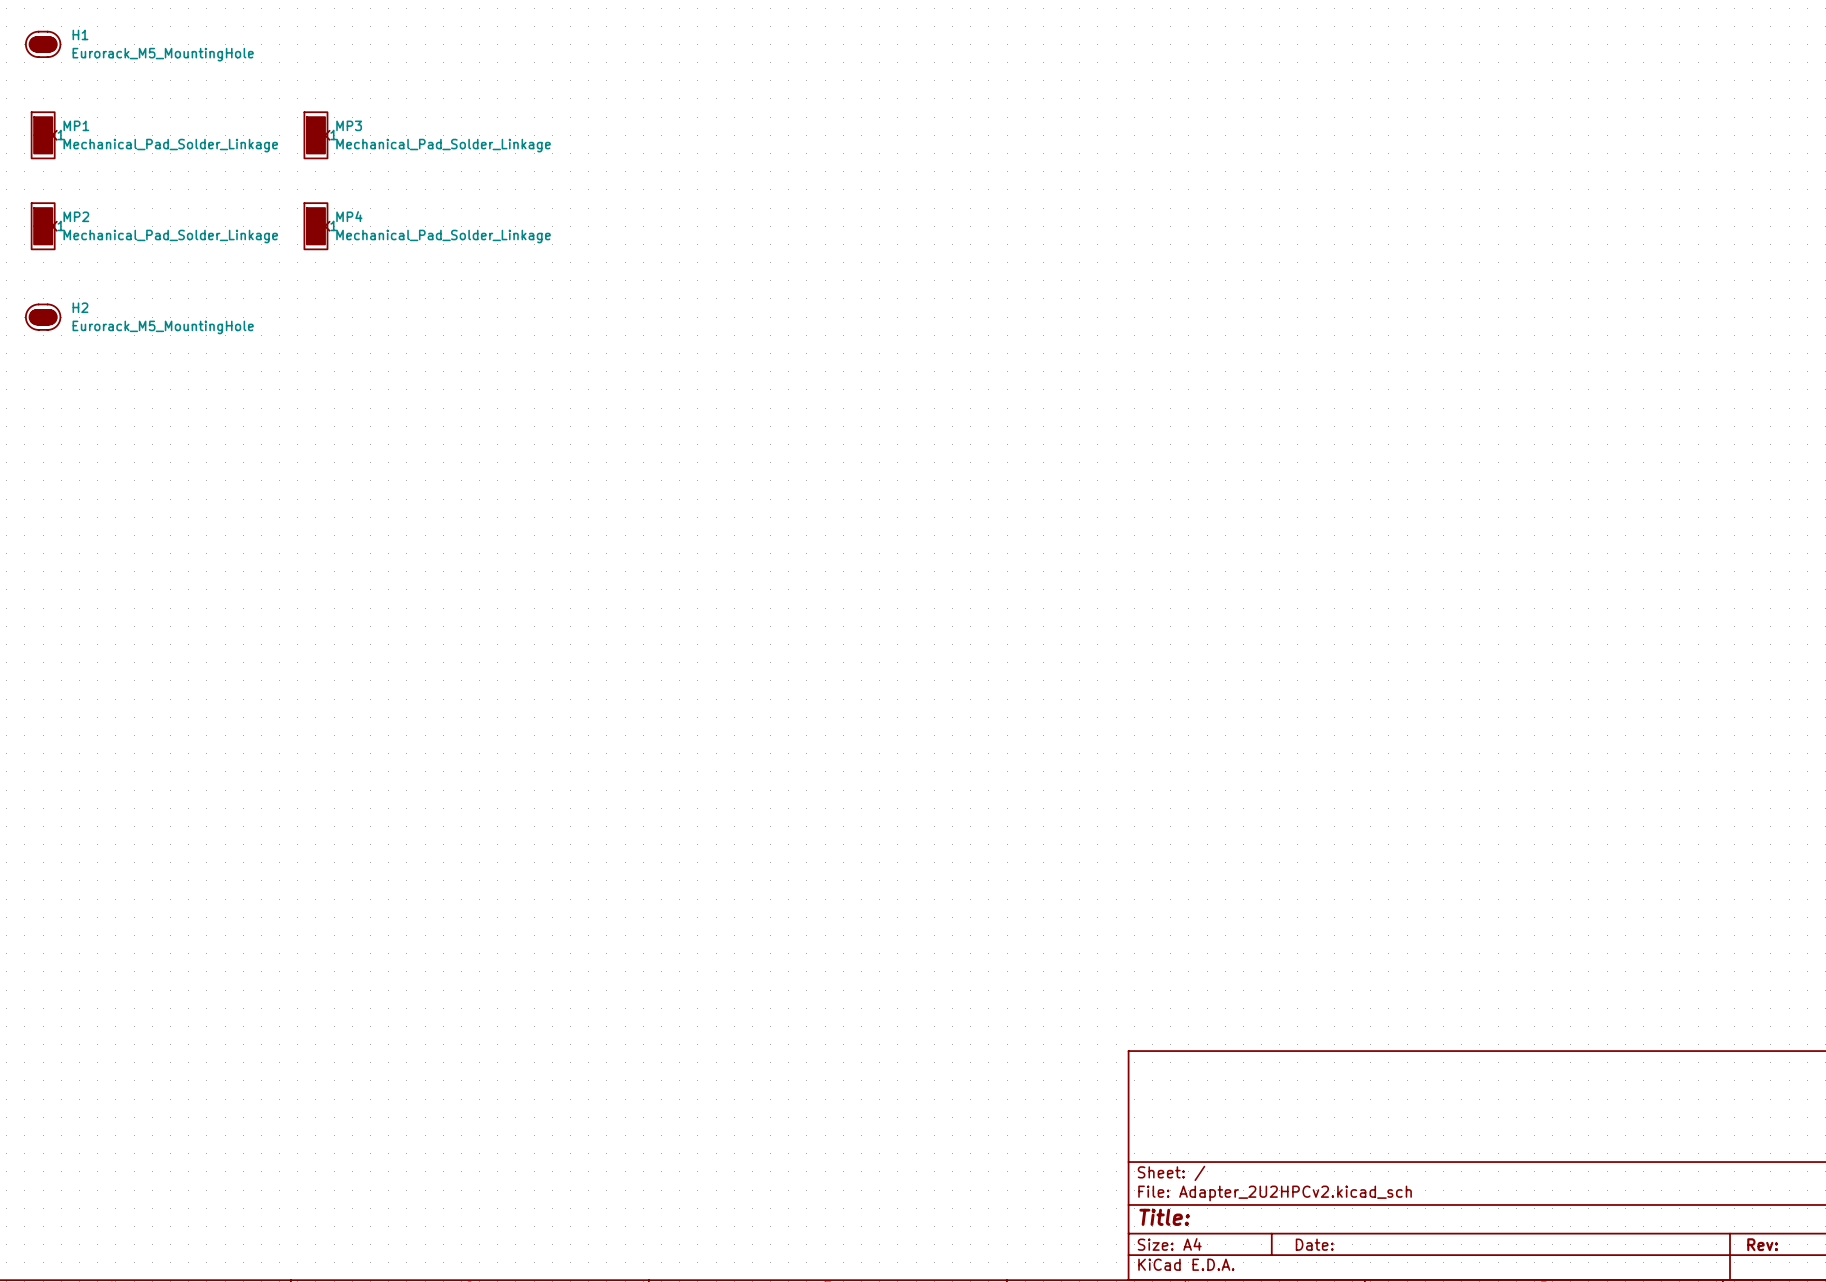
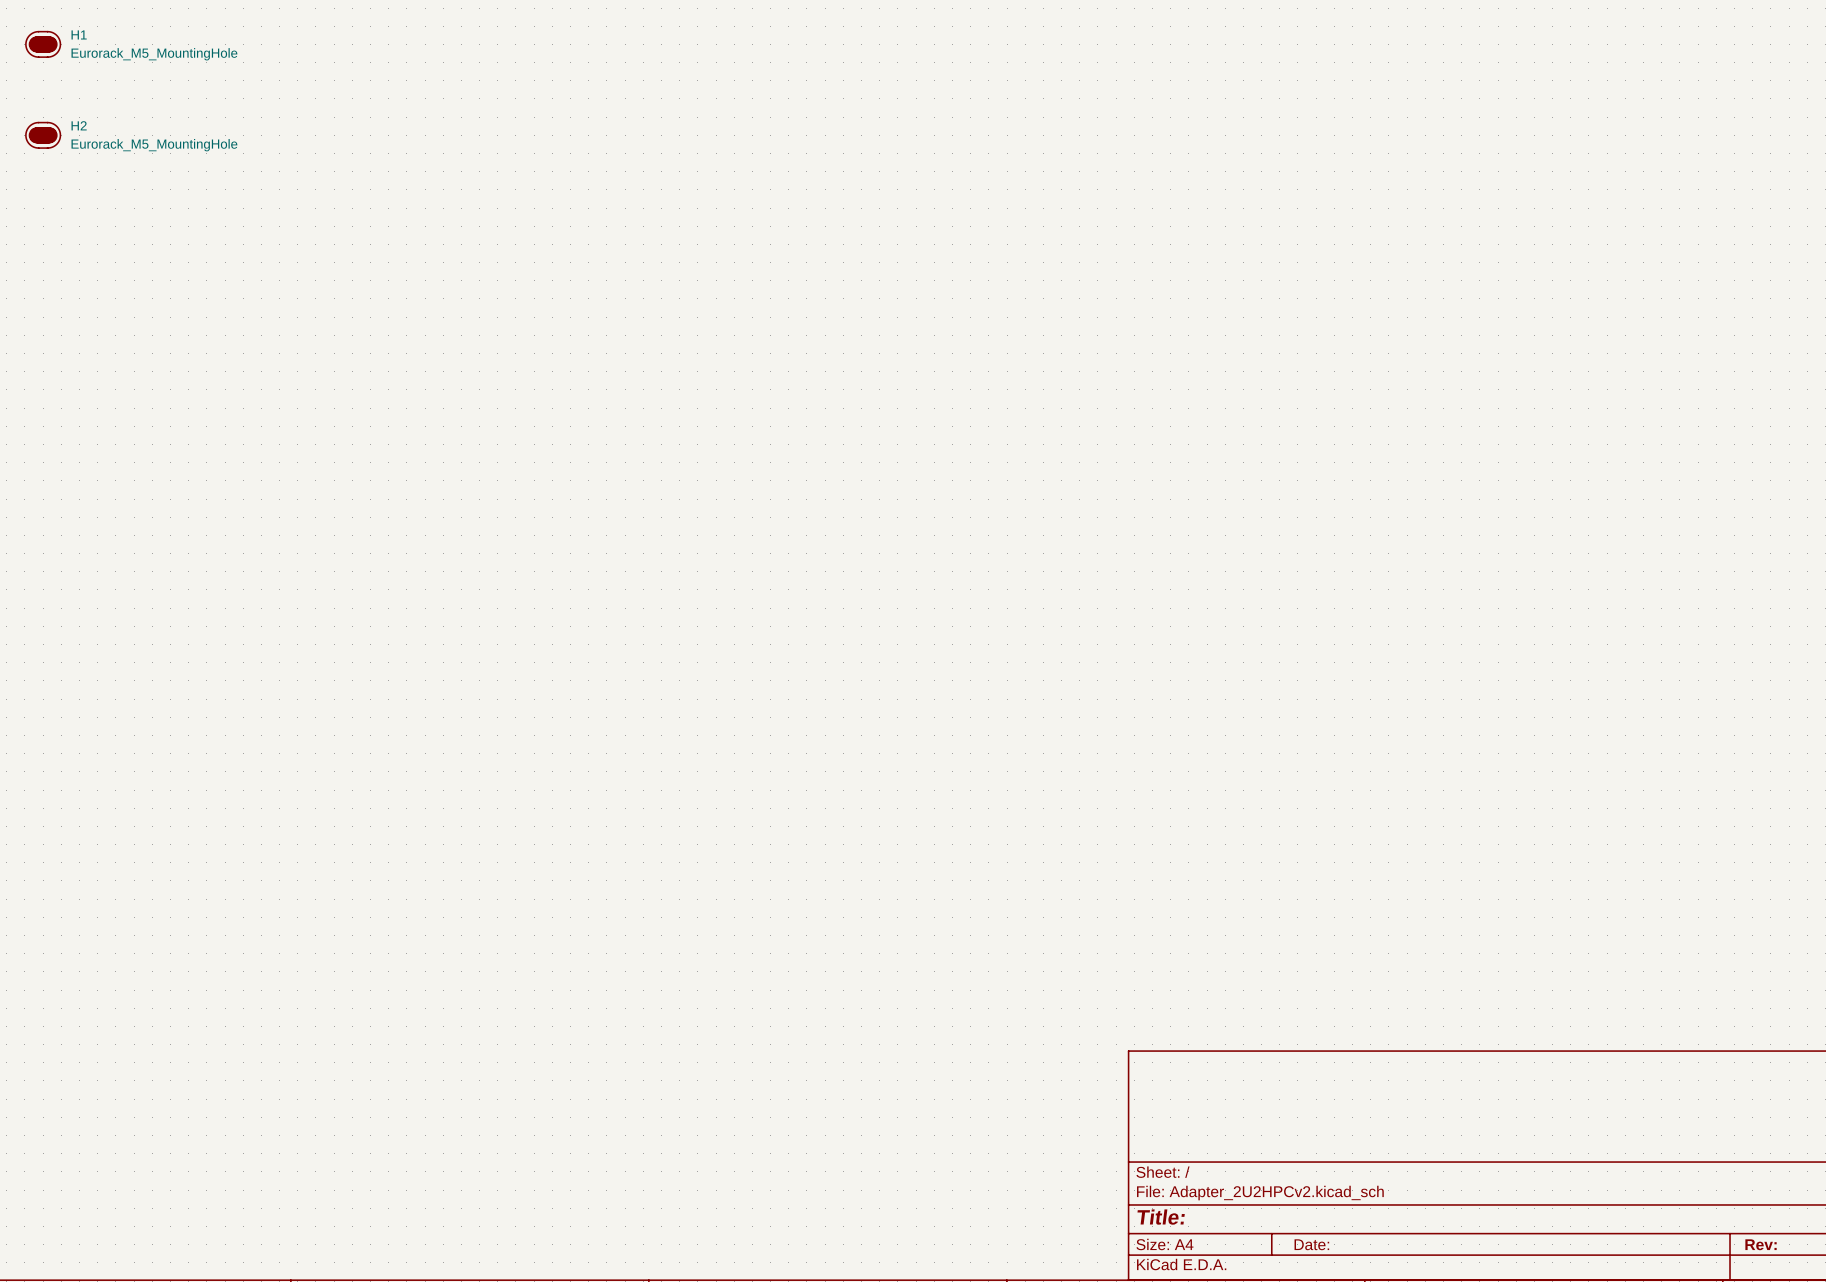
MP1: Mechanical_Pad_Solder_Linkage (44, 135) -> none
MP3: Mechanical_Pad_Solder_Linkage (316, 135) -> none
MP2: Mechanical_Pad_Solder_Linkage (44, 226) -> none
MP4: Mechanical_Pad_Solder_Linkage (316, 226) -> none
H2 position: (43, 317) -> (43, 135)

